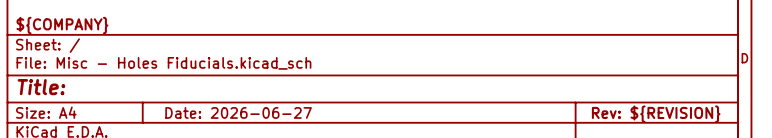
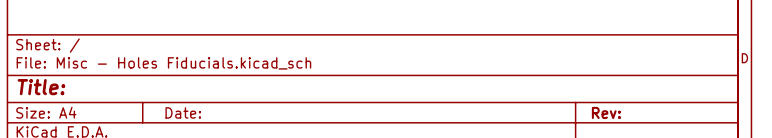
title block: ${COMPANY} (62, 25) -> none
title block: Date: 2026-06-27 (238, 112) -> Date: (183, 112)
title block: Rev: ${REVISION} (656, 114) -> Rev: (606, 112)

